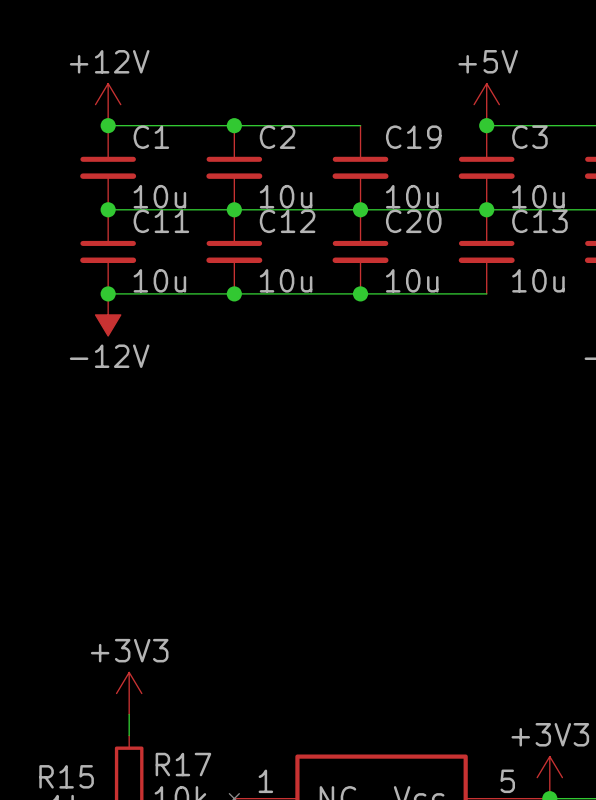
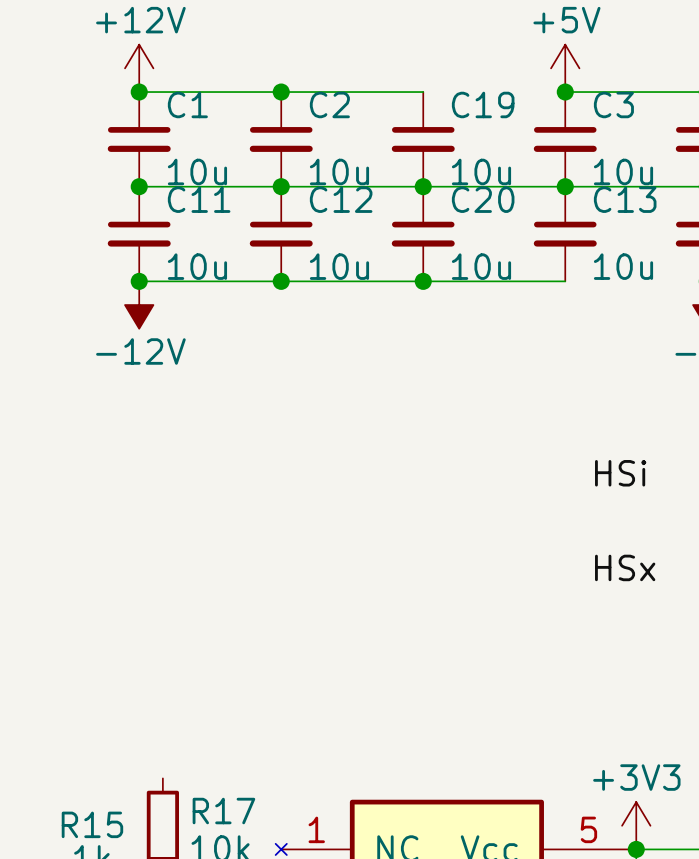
label: none -> HSi (620, 473)
label: none -> HSx (625, 567)
power symbol: +3V3 (129, 693) -> none
wire: (129, 714) (129, 735) -> none

